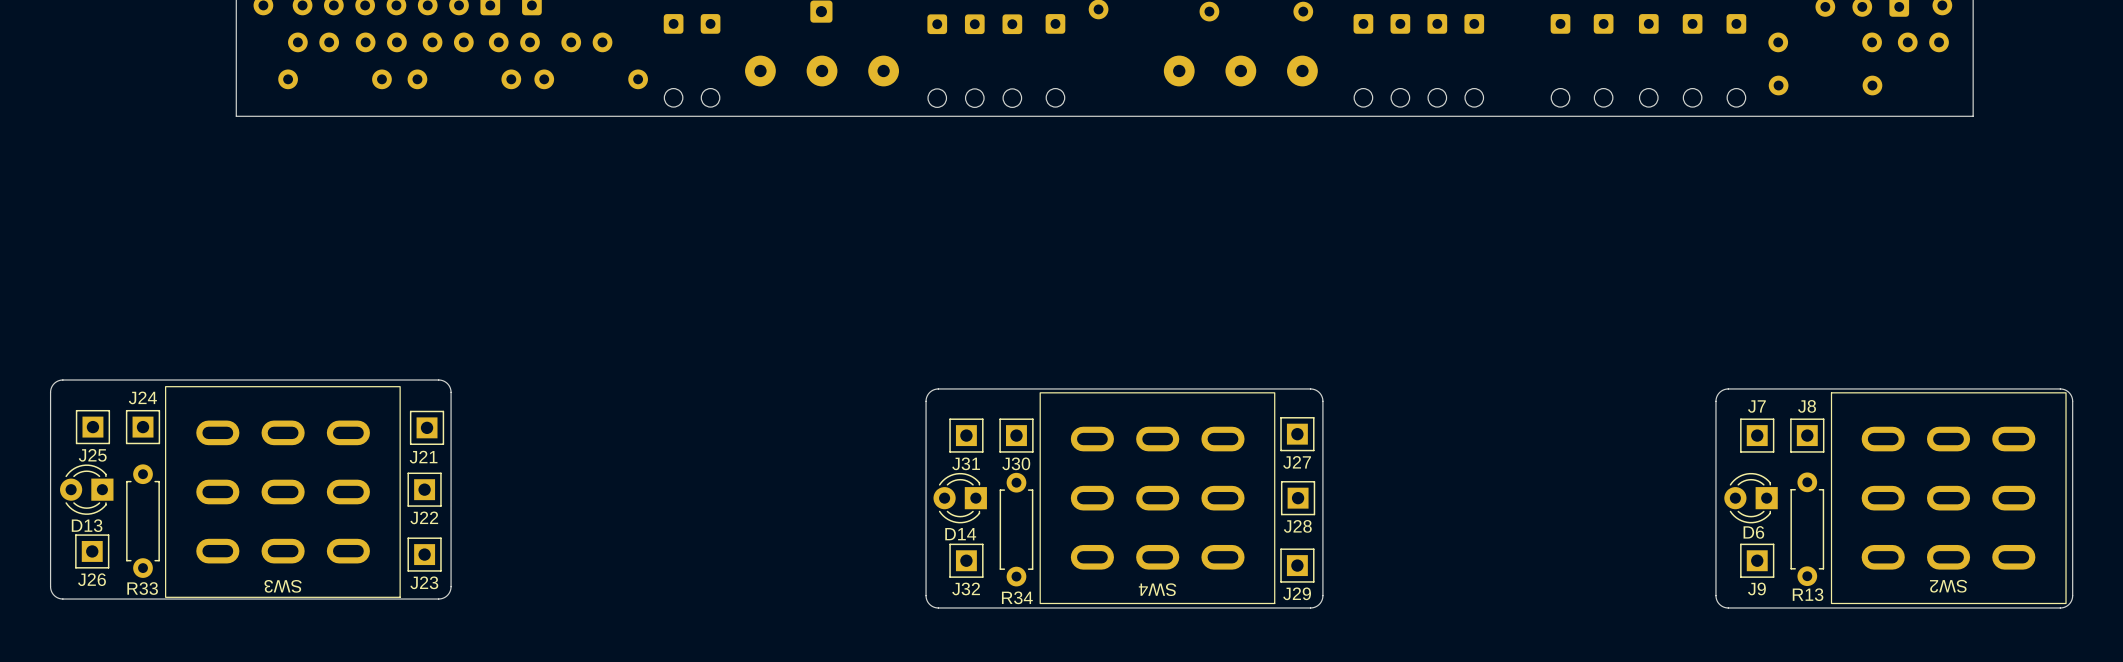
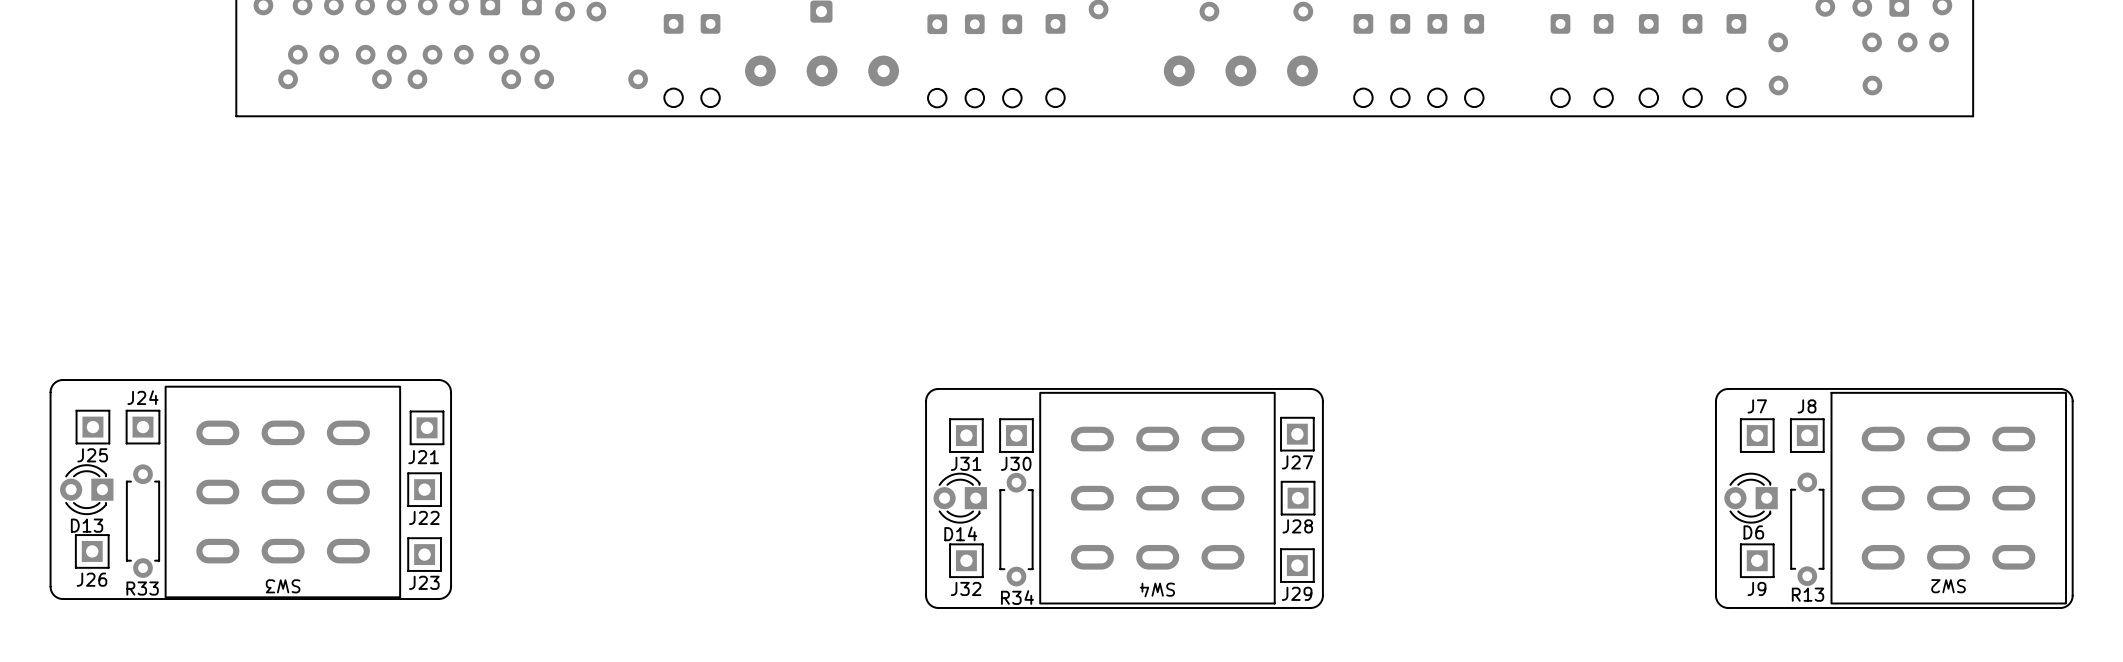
part position: (313, 42) -> (313, 54)
part position: (381, 42) -> (381, 54)
part position: (448, 42) -> (448, 54)
part position: (514, 42) -> (514, 54)
part position: (586, 42) -> (580, 11)

